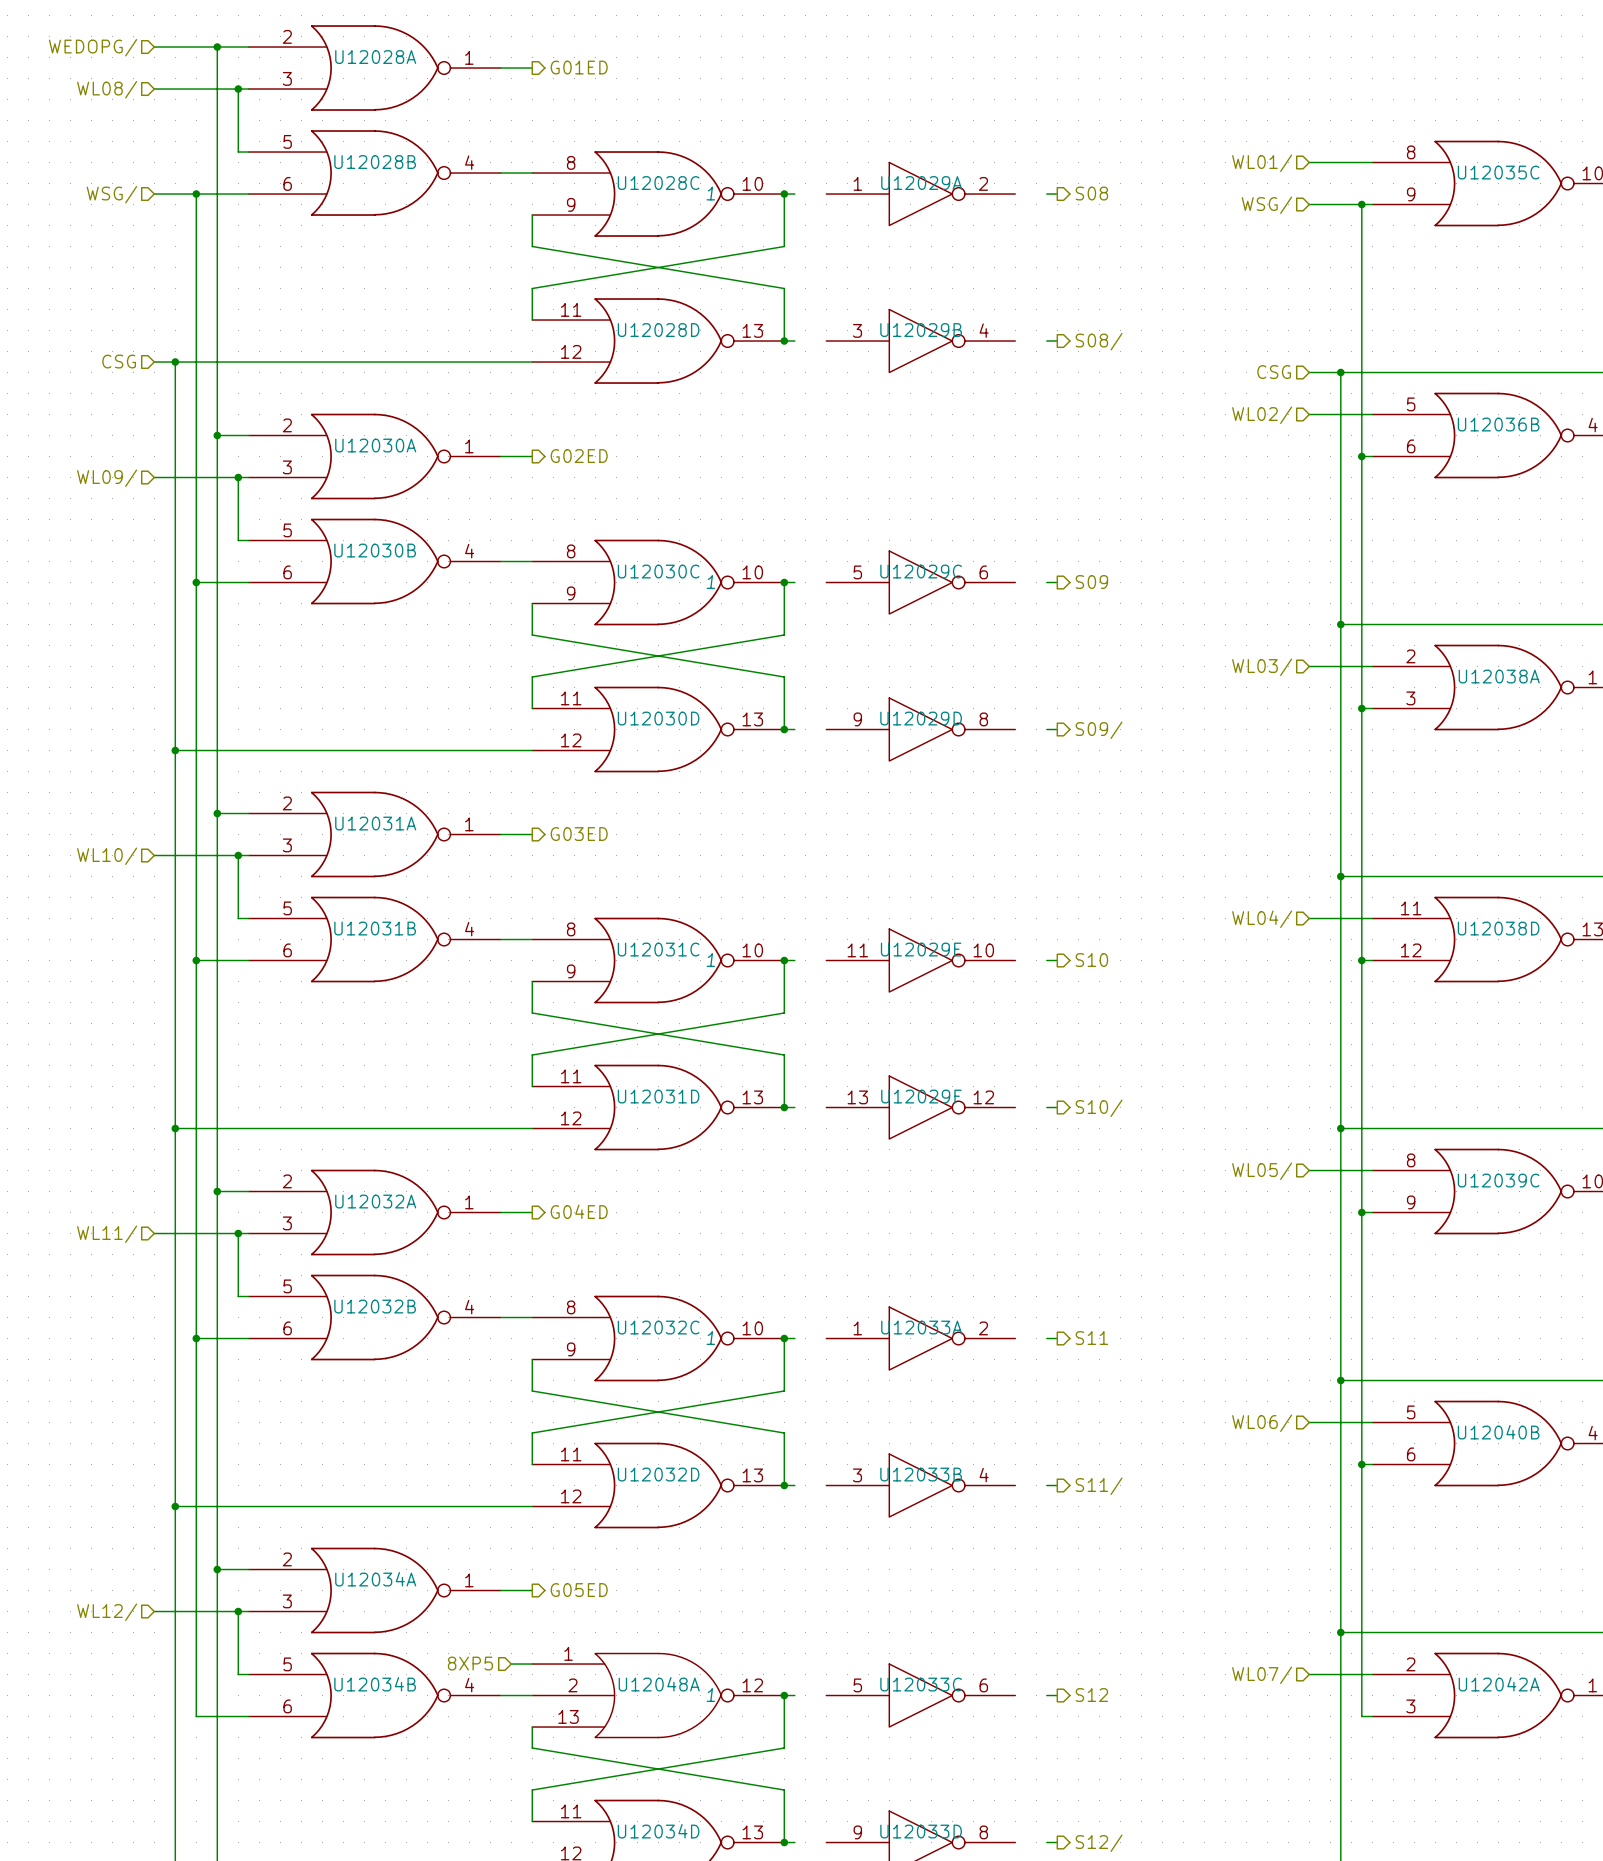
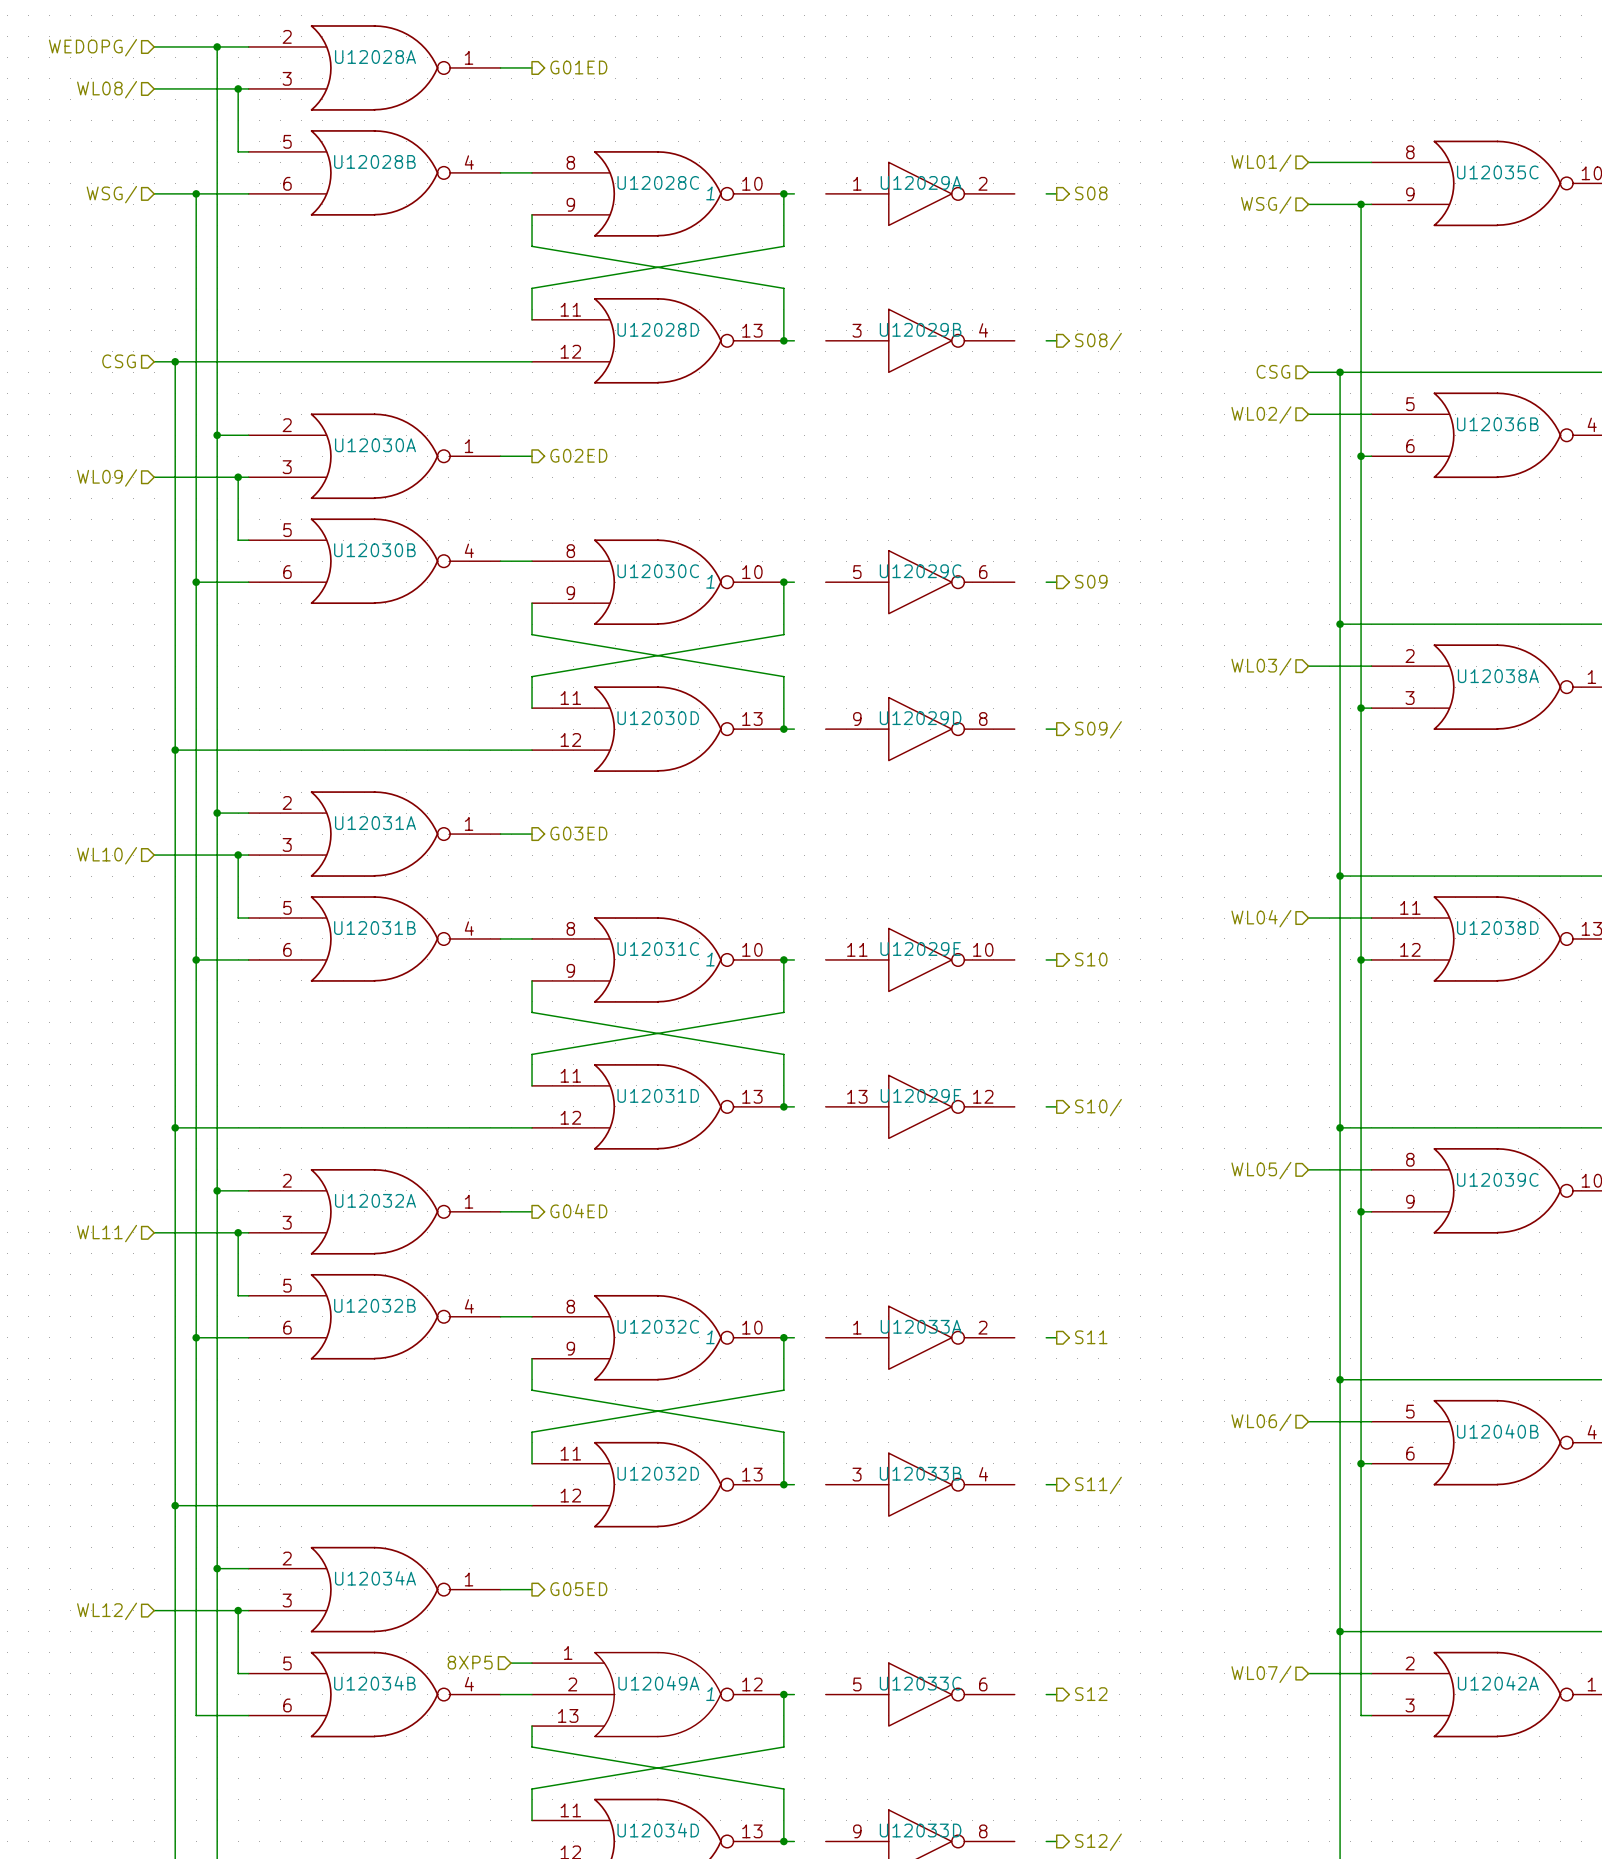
U12048A name: U12048A (659, 1684) -> U12049A (658, 1683)

